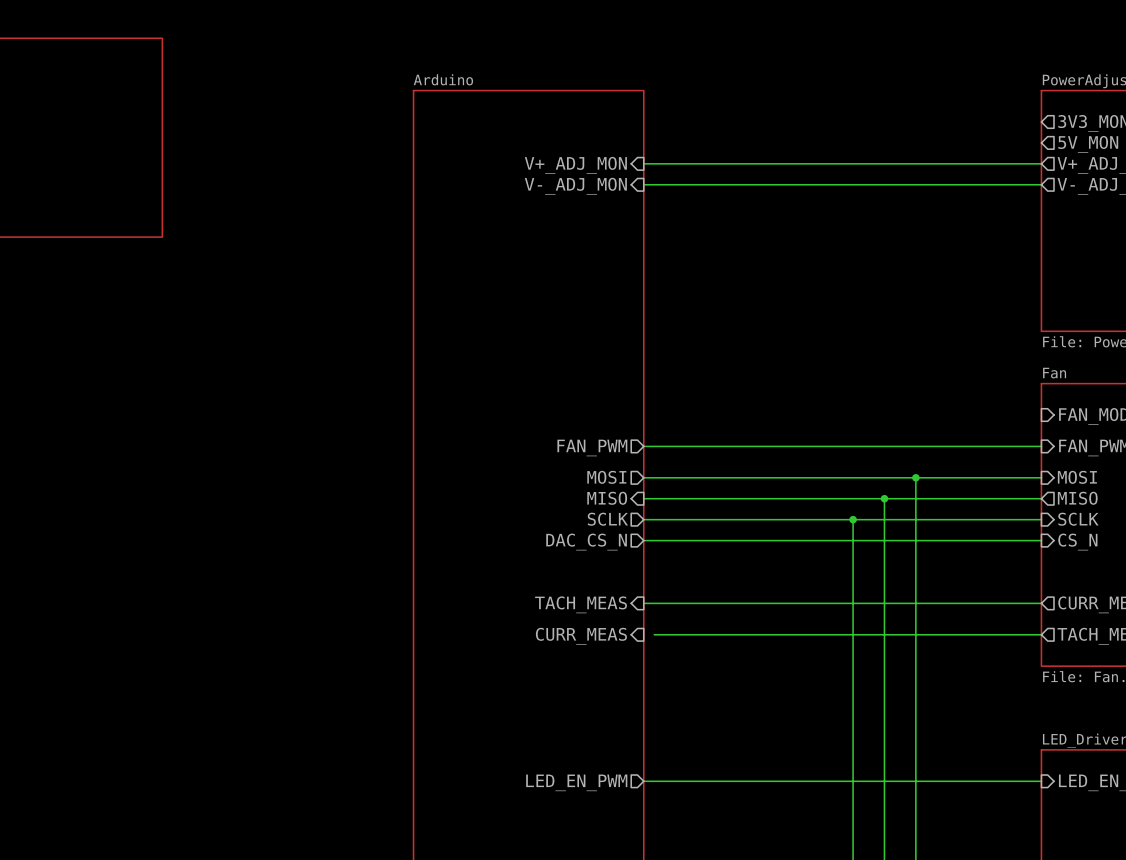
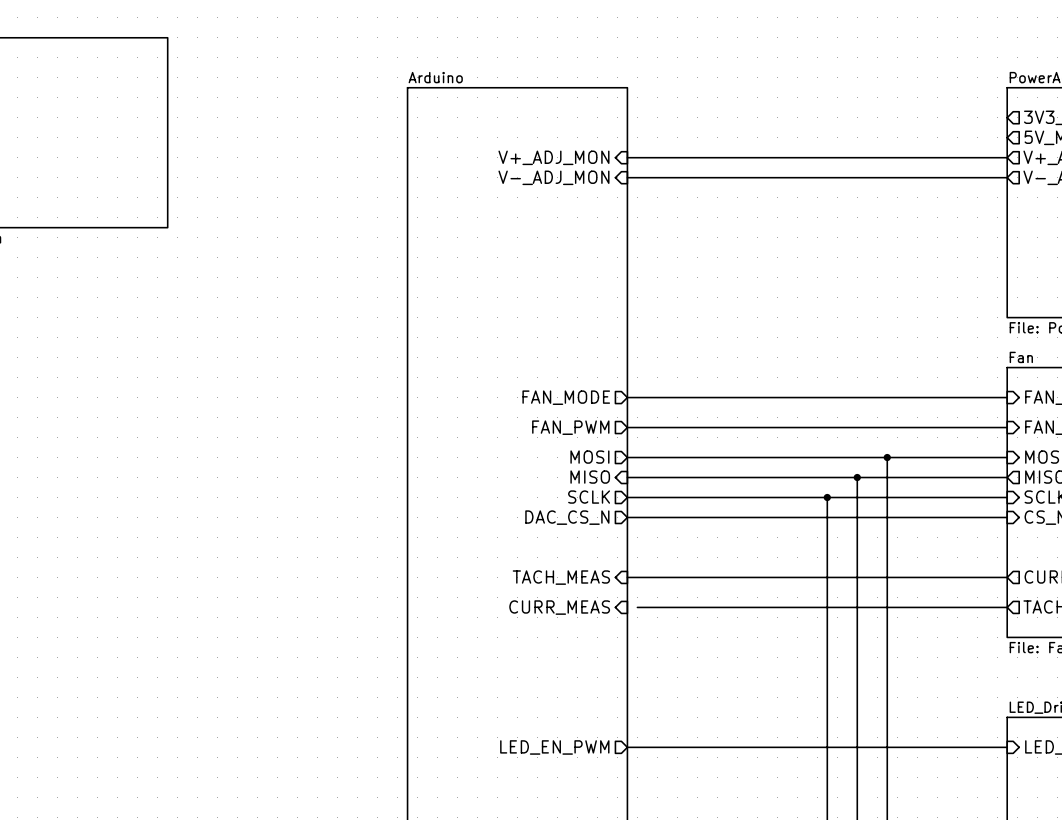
wire: none -> (627, 397) (1007, 397)
sheet pin: none -> FAN_MODE (566, 397)

